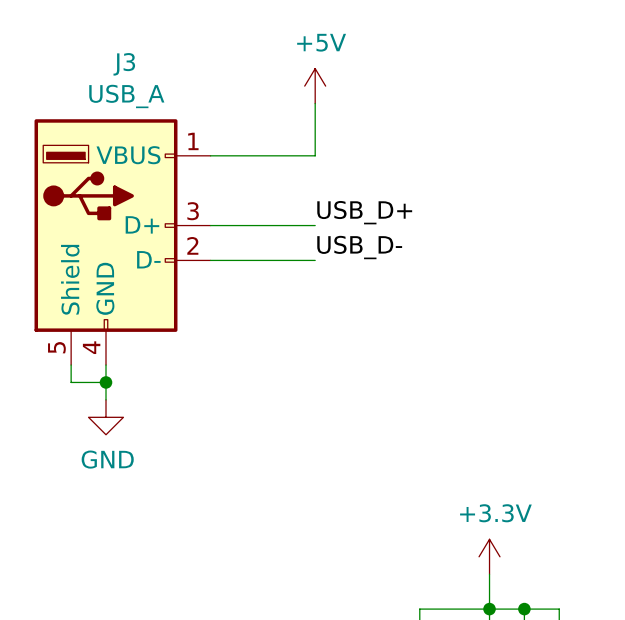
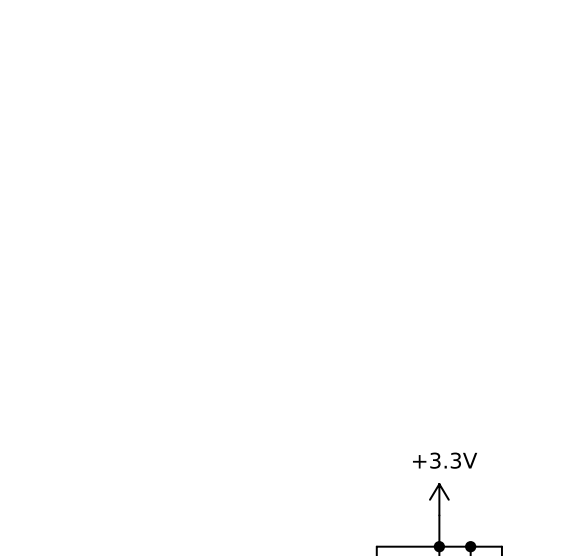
power symbol: +5V (315, 86) -> none
wire: (315, 103) (315, 155) (210, 155) -> none
label: USB_D+ (364, 212) -> none
wire: (210, 225) (315, 225) -> none
J3: USB_A (122, 242) -> none
label: USB_D- (359, 247) -> none
wire: (210, 260) (315, 260) -> none
wire: (71, 365) (71, 382) (106, 382) -> none
wire: (106, 365) (106, 399) -> none
junction: (106, 382) -> none
power symbol: GND (106, 417) -> none

